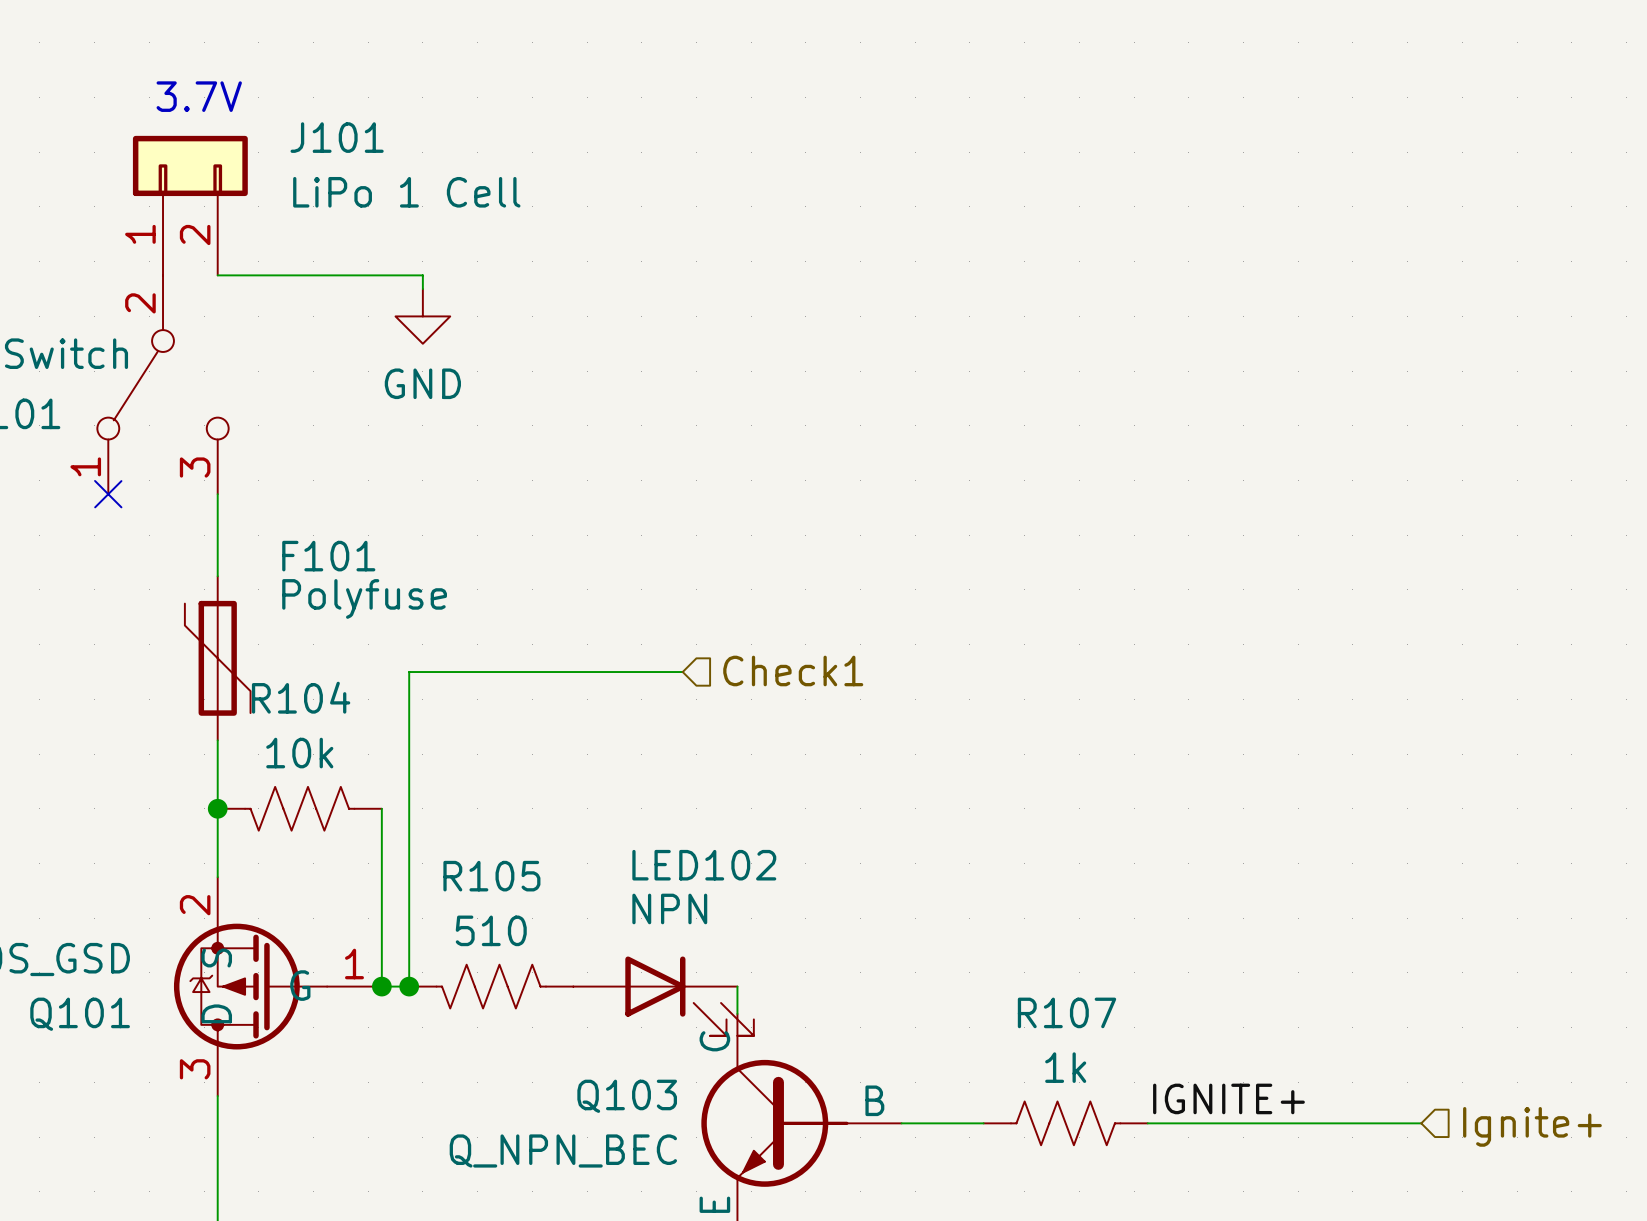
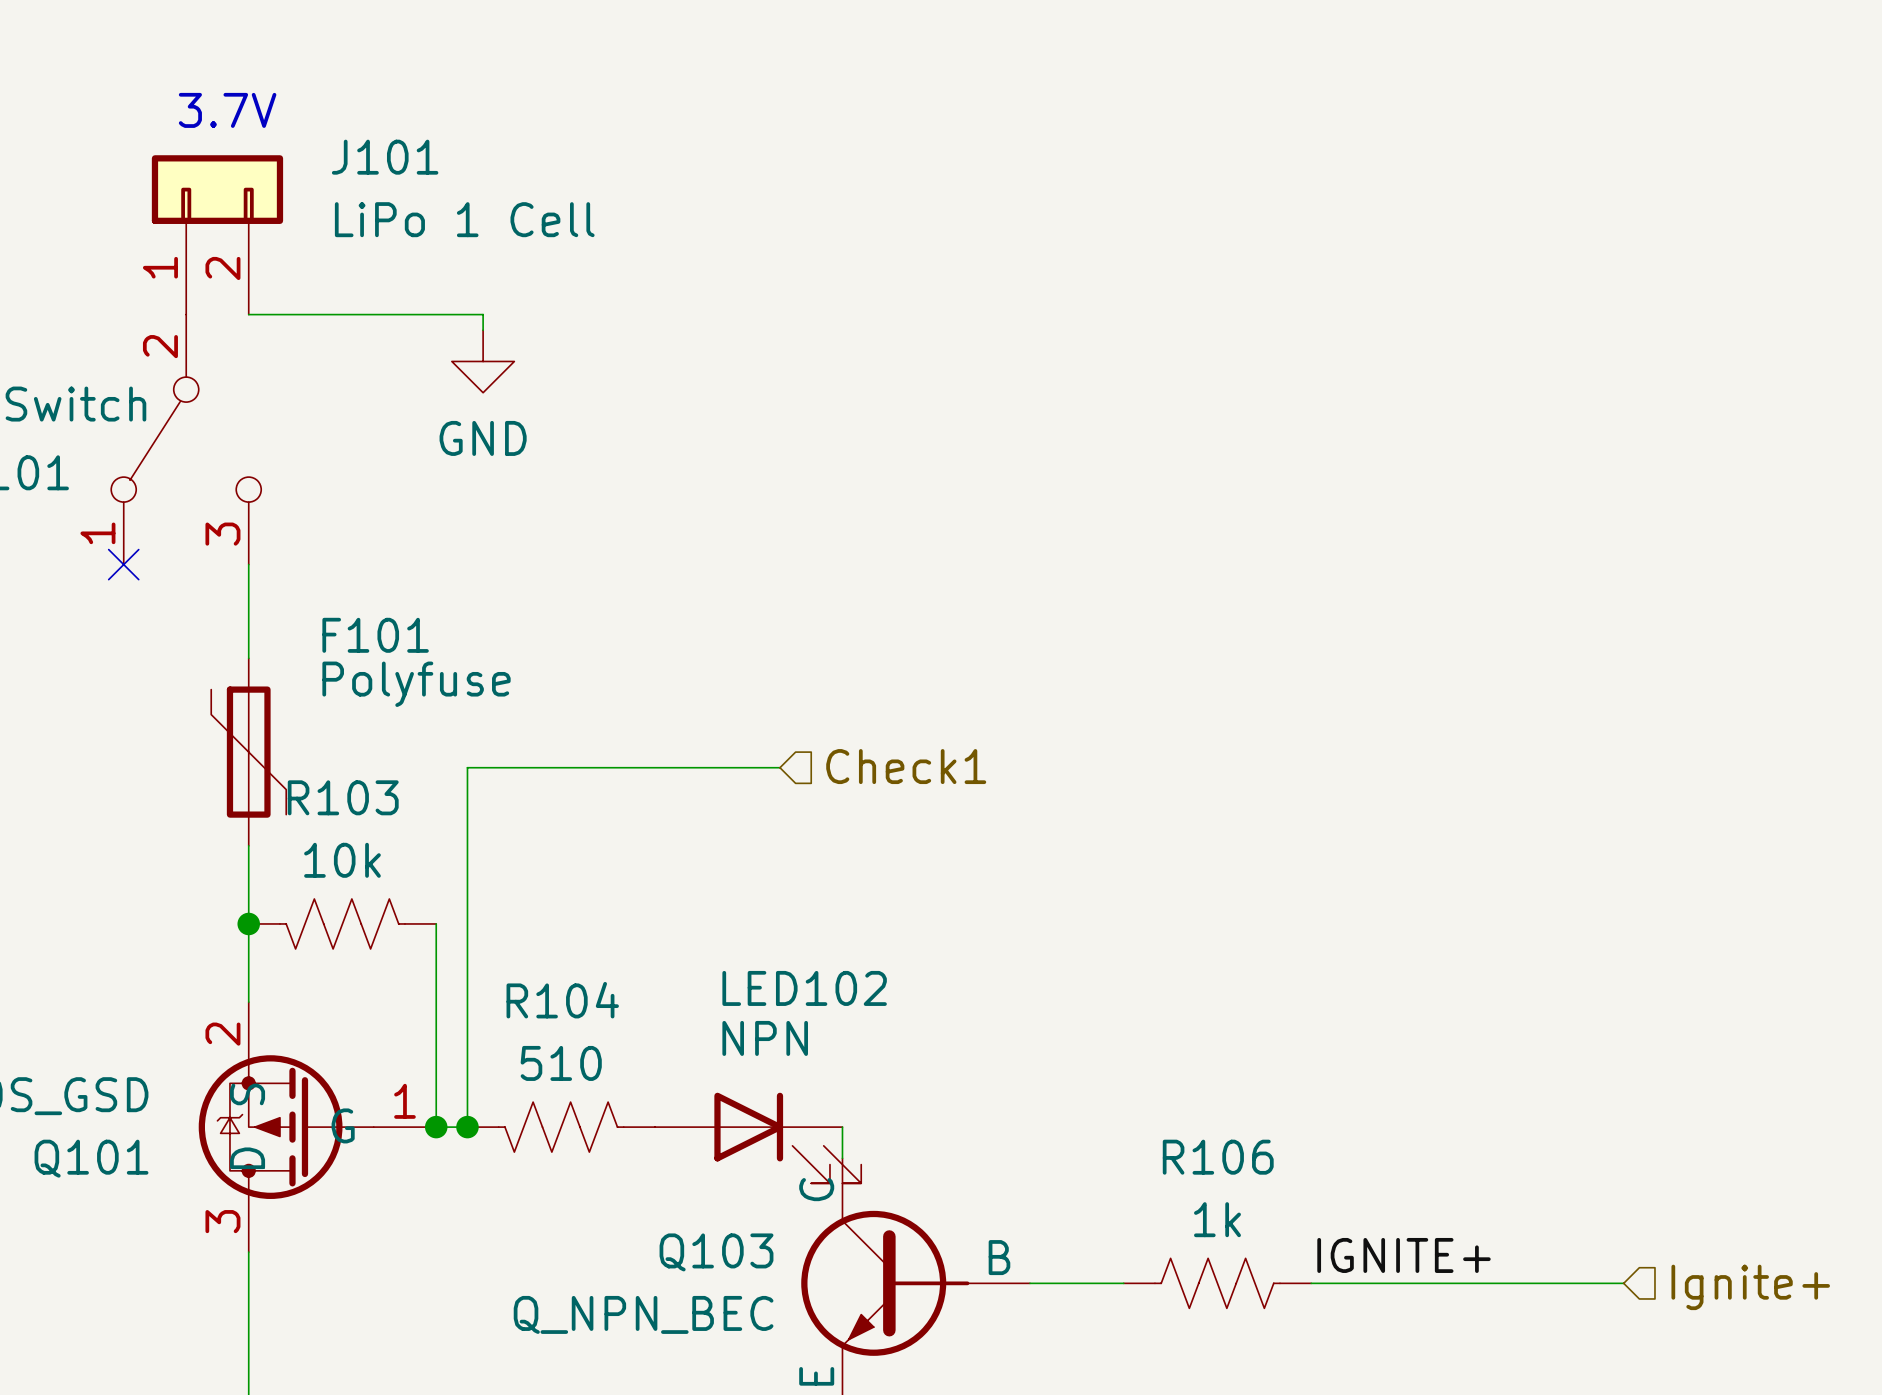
R104 name: R104 (301, 697) -> R103 (343, 797)
R105 name: R105 (491, 876) -> R104 (562, 1000)
R107 name: R107 (1067, 1012) -> R106 (1218, 1157)

